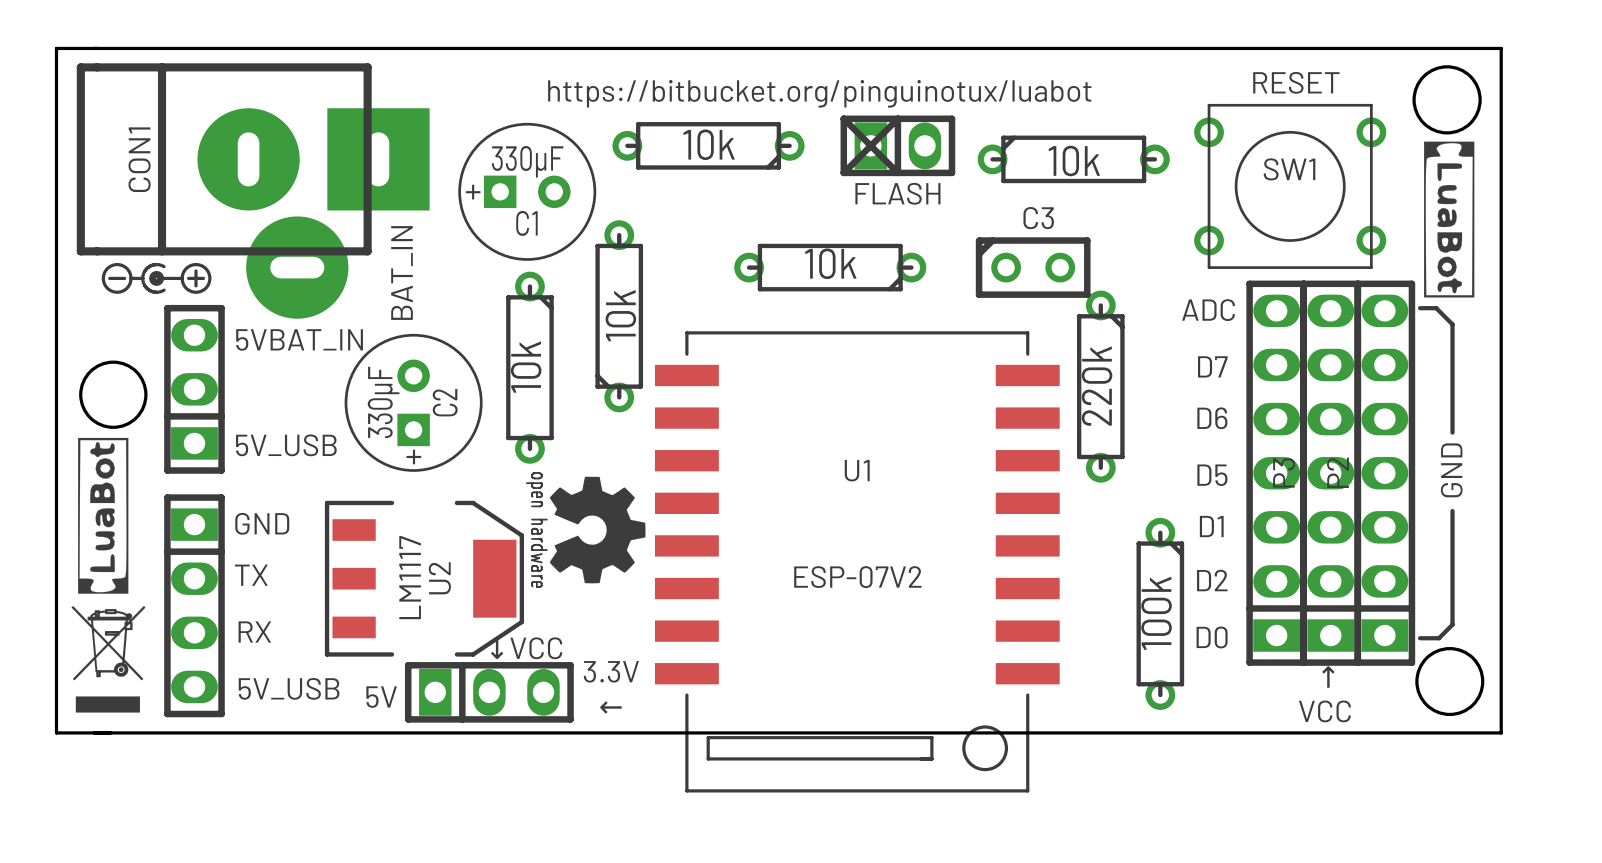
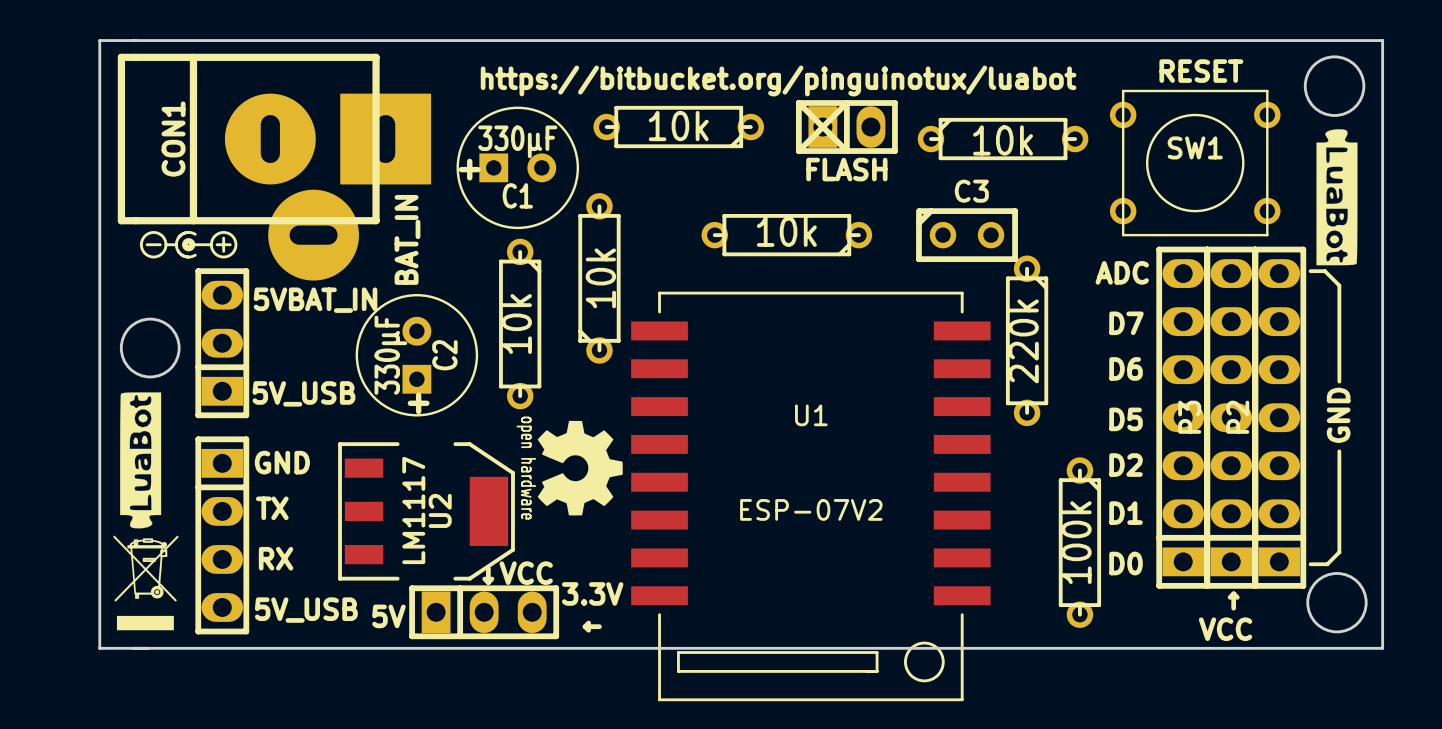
drawing shape: [1424, 141, 1475, 298] -> [1316, 129, 1358, 266]
drawing shape: [78, 437, 129, 594] -> [120, 392, 162, 529]
text: D1 (1211, 526) -> D2 (1126, 465)
text: D2 (1212, 580) -> D1 (1126, 513)

